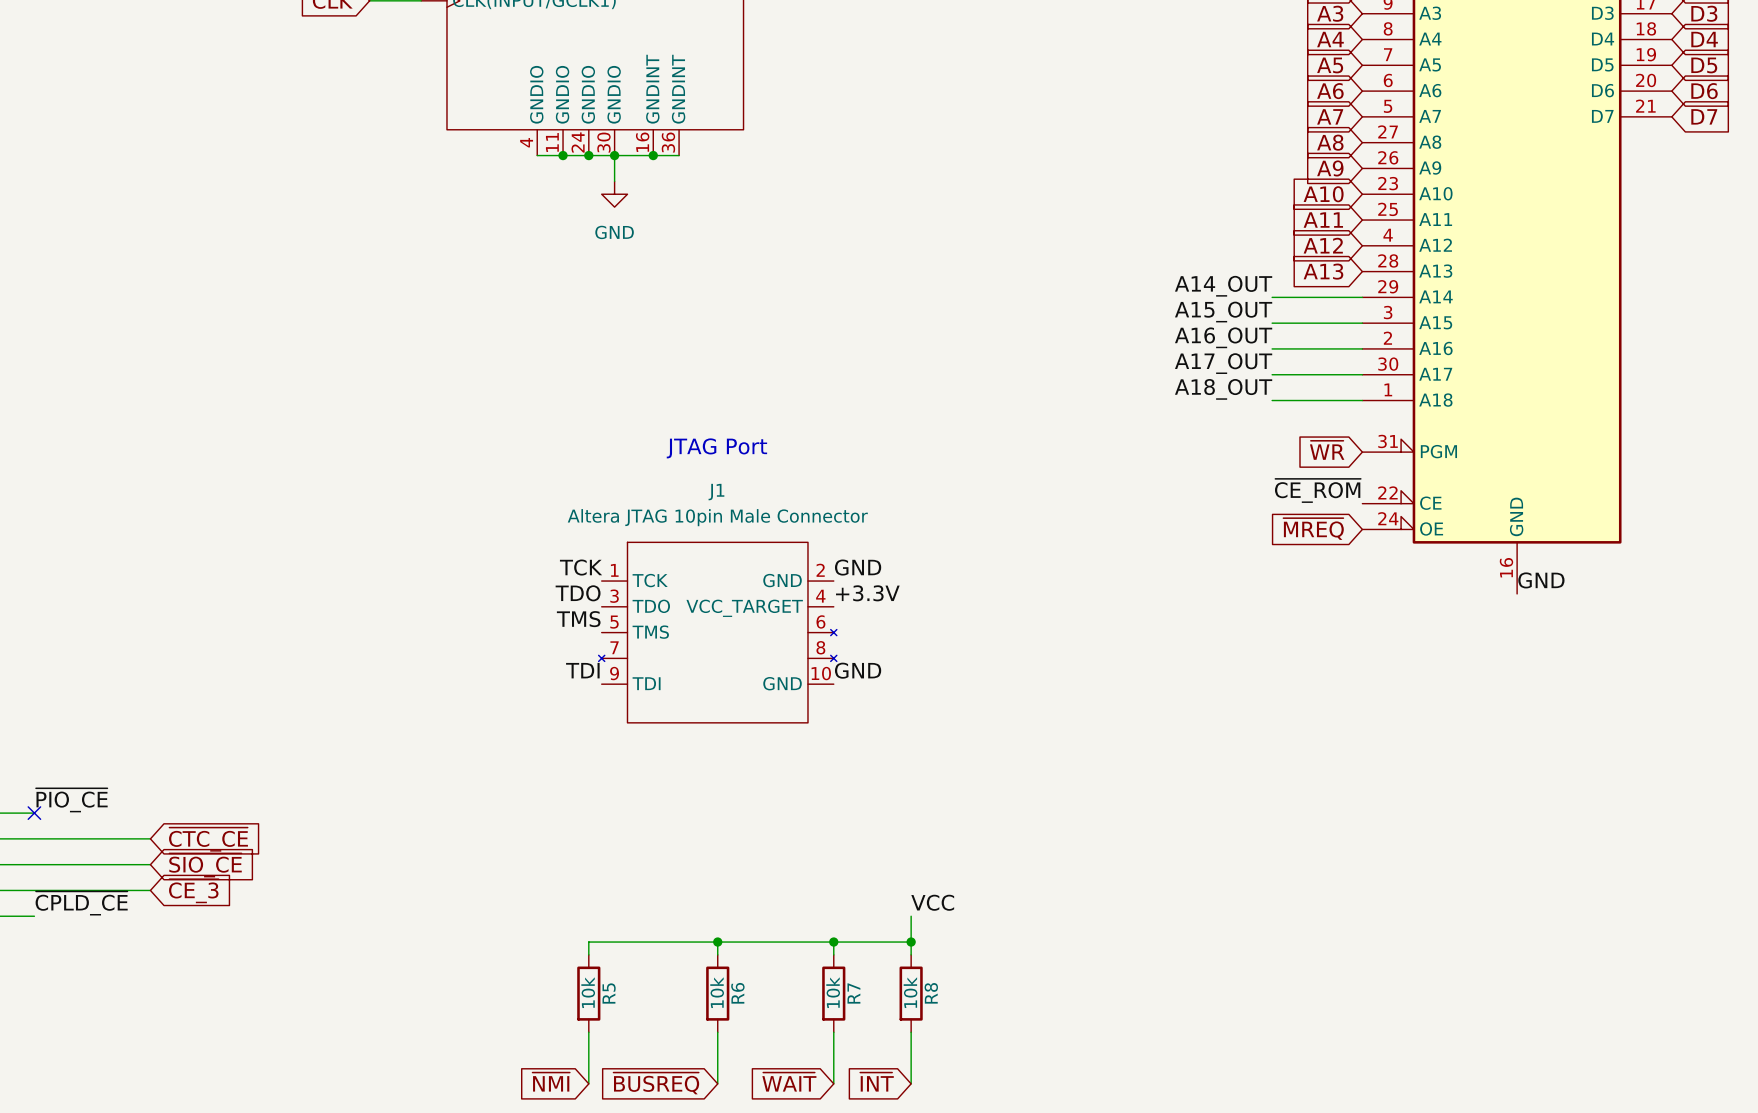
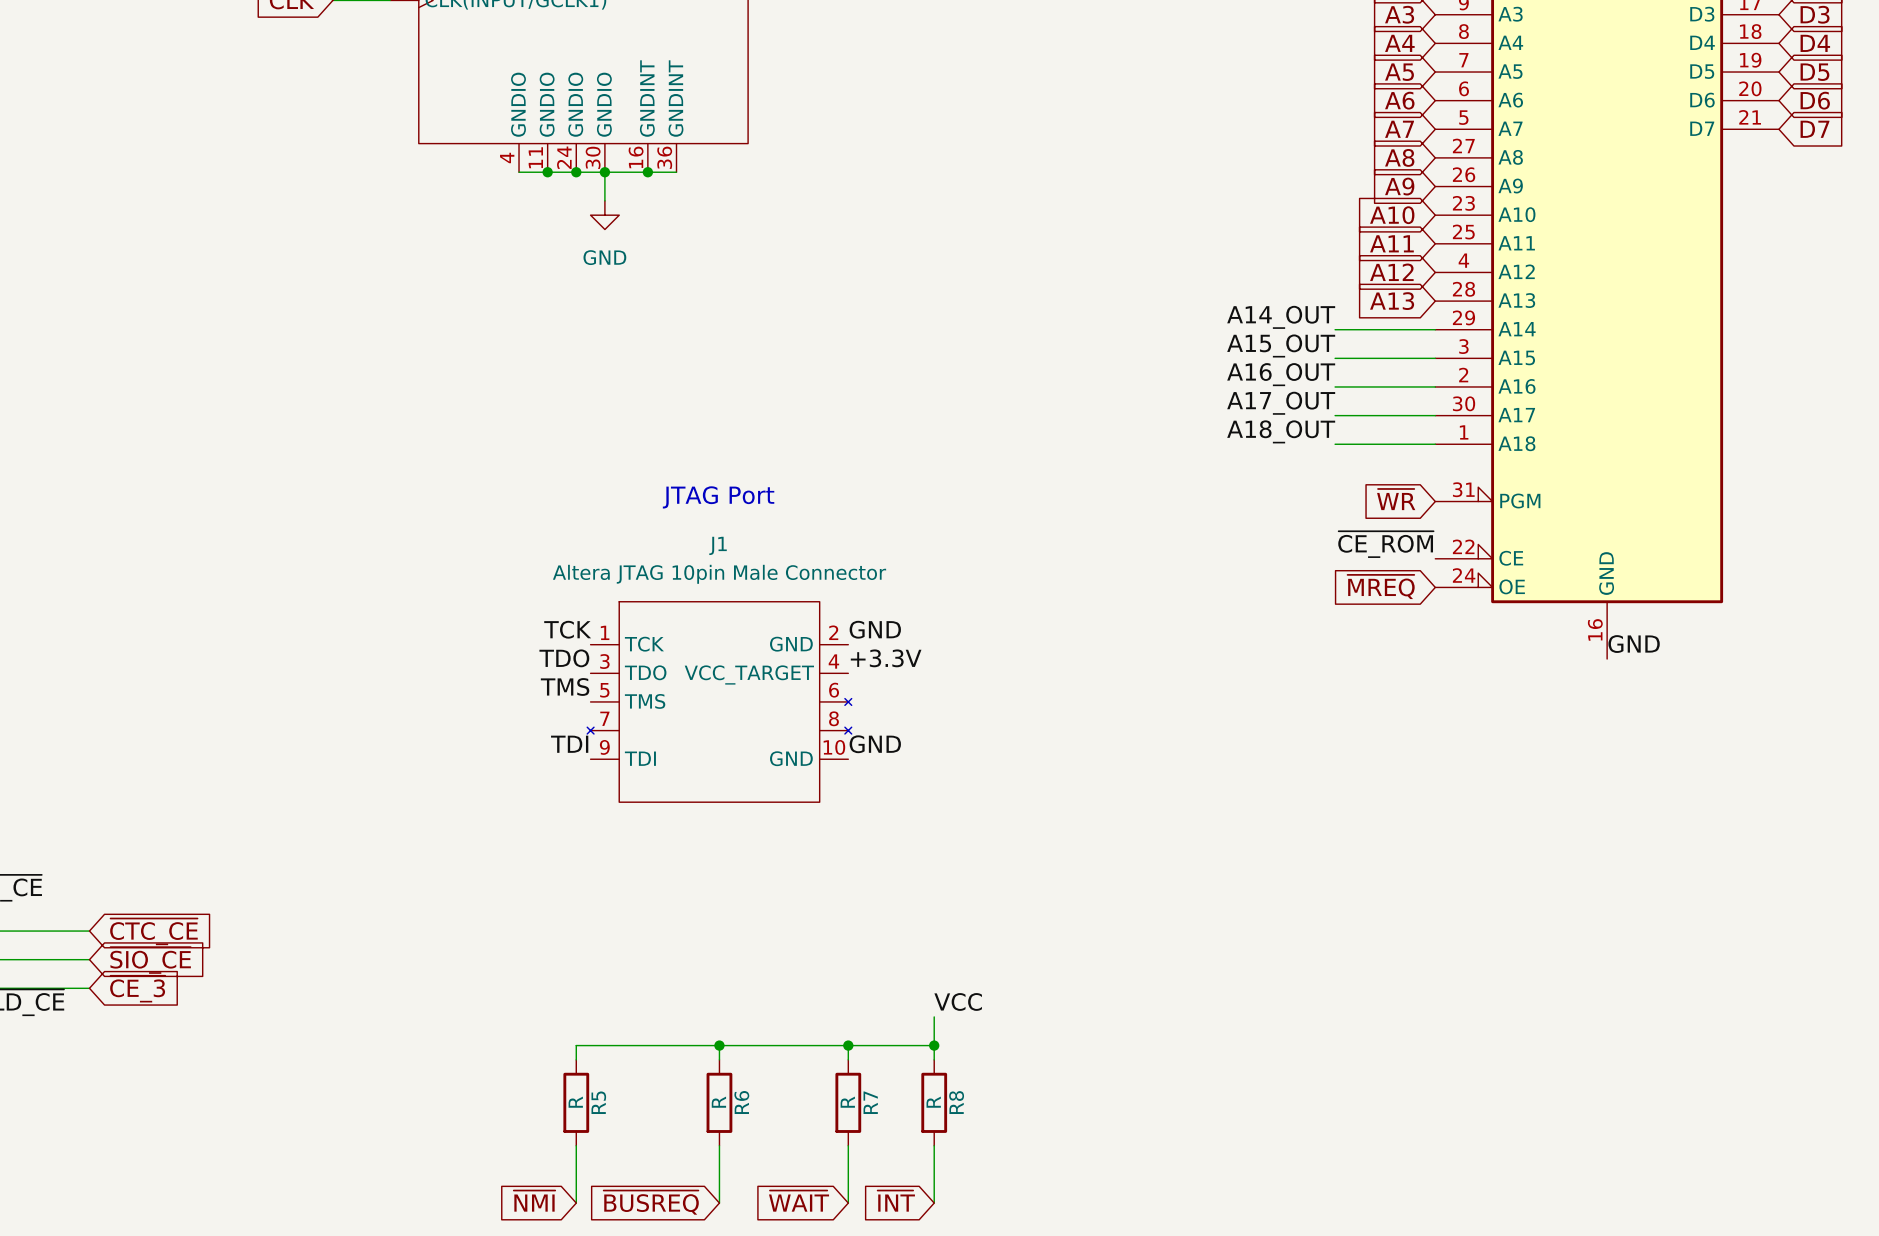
R5 value: 10k (588, 992) -> R (575, 1102)
R6 value: 10k (717, 992) -> R (718, 1102)
R7 value: 10k (833, 992) -> R (847, 1102)
R8 value: 10k (910, 992) -> R (933, 1102)

